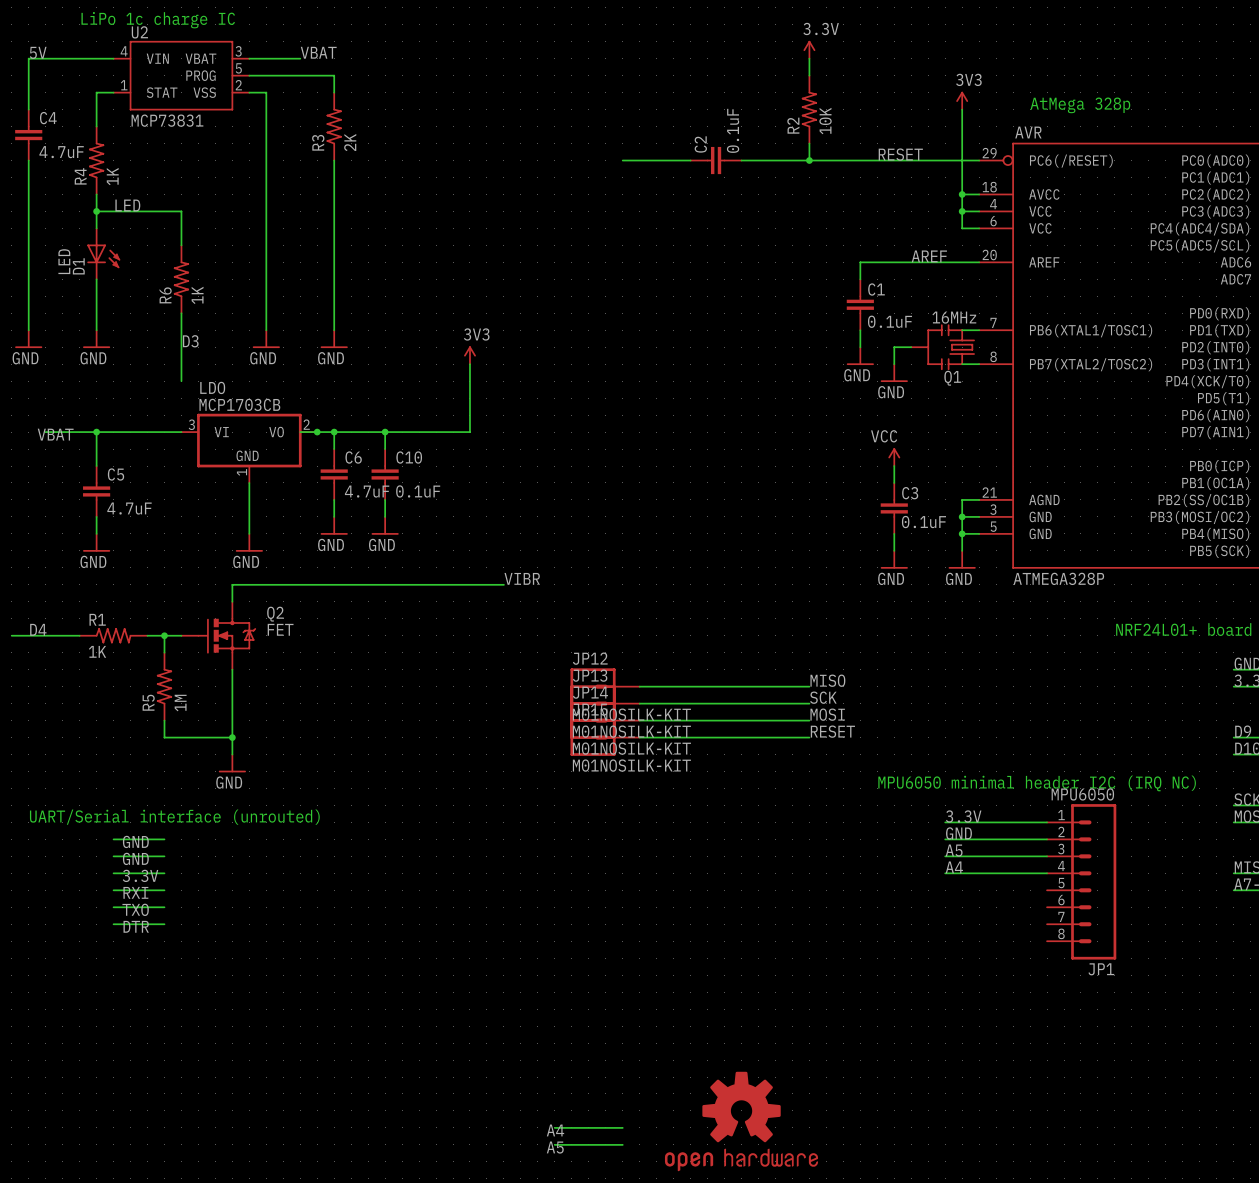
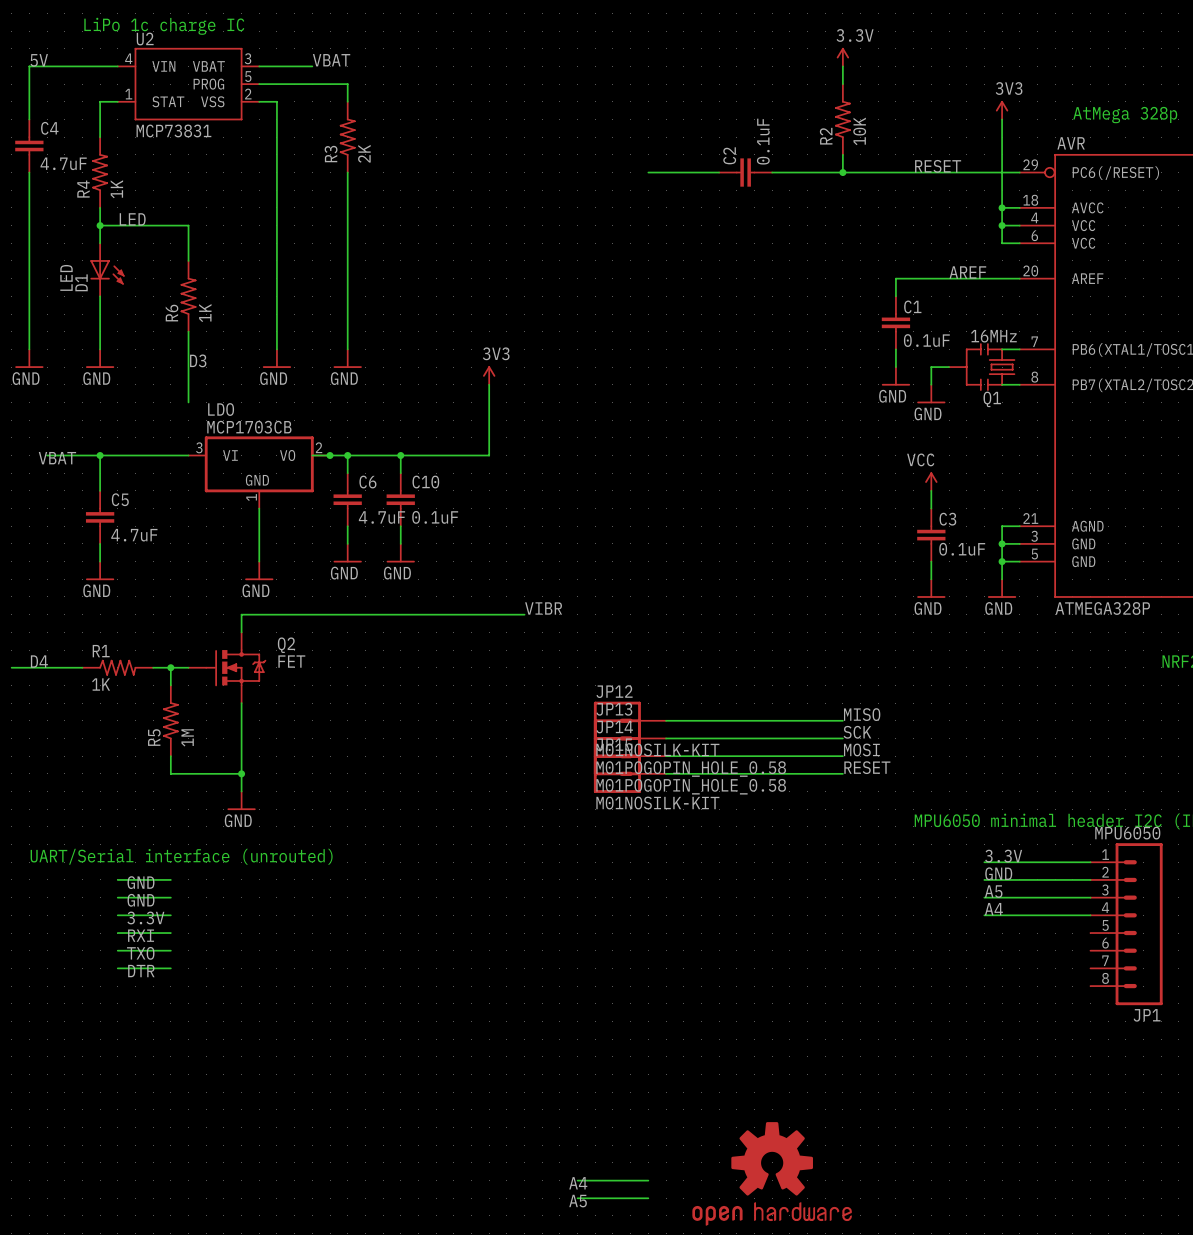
JP13 value: M01NOSILK-KIT (631, 731) -> M01POGOPIN_HOLE_0.58 (691, 769)
JP14 value: M01NOSILK-KIT (631, 748) -> M01POGOPIN_HOLE_0.58 (691, 786)

